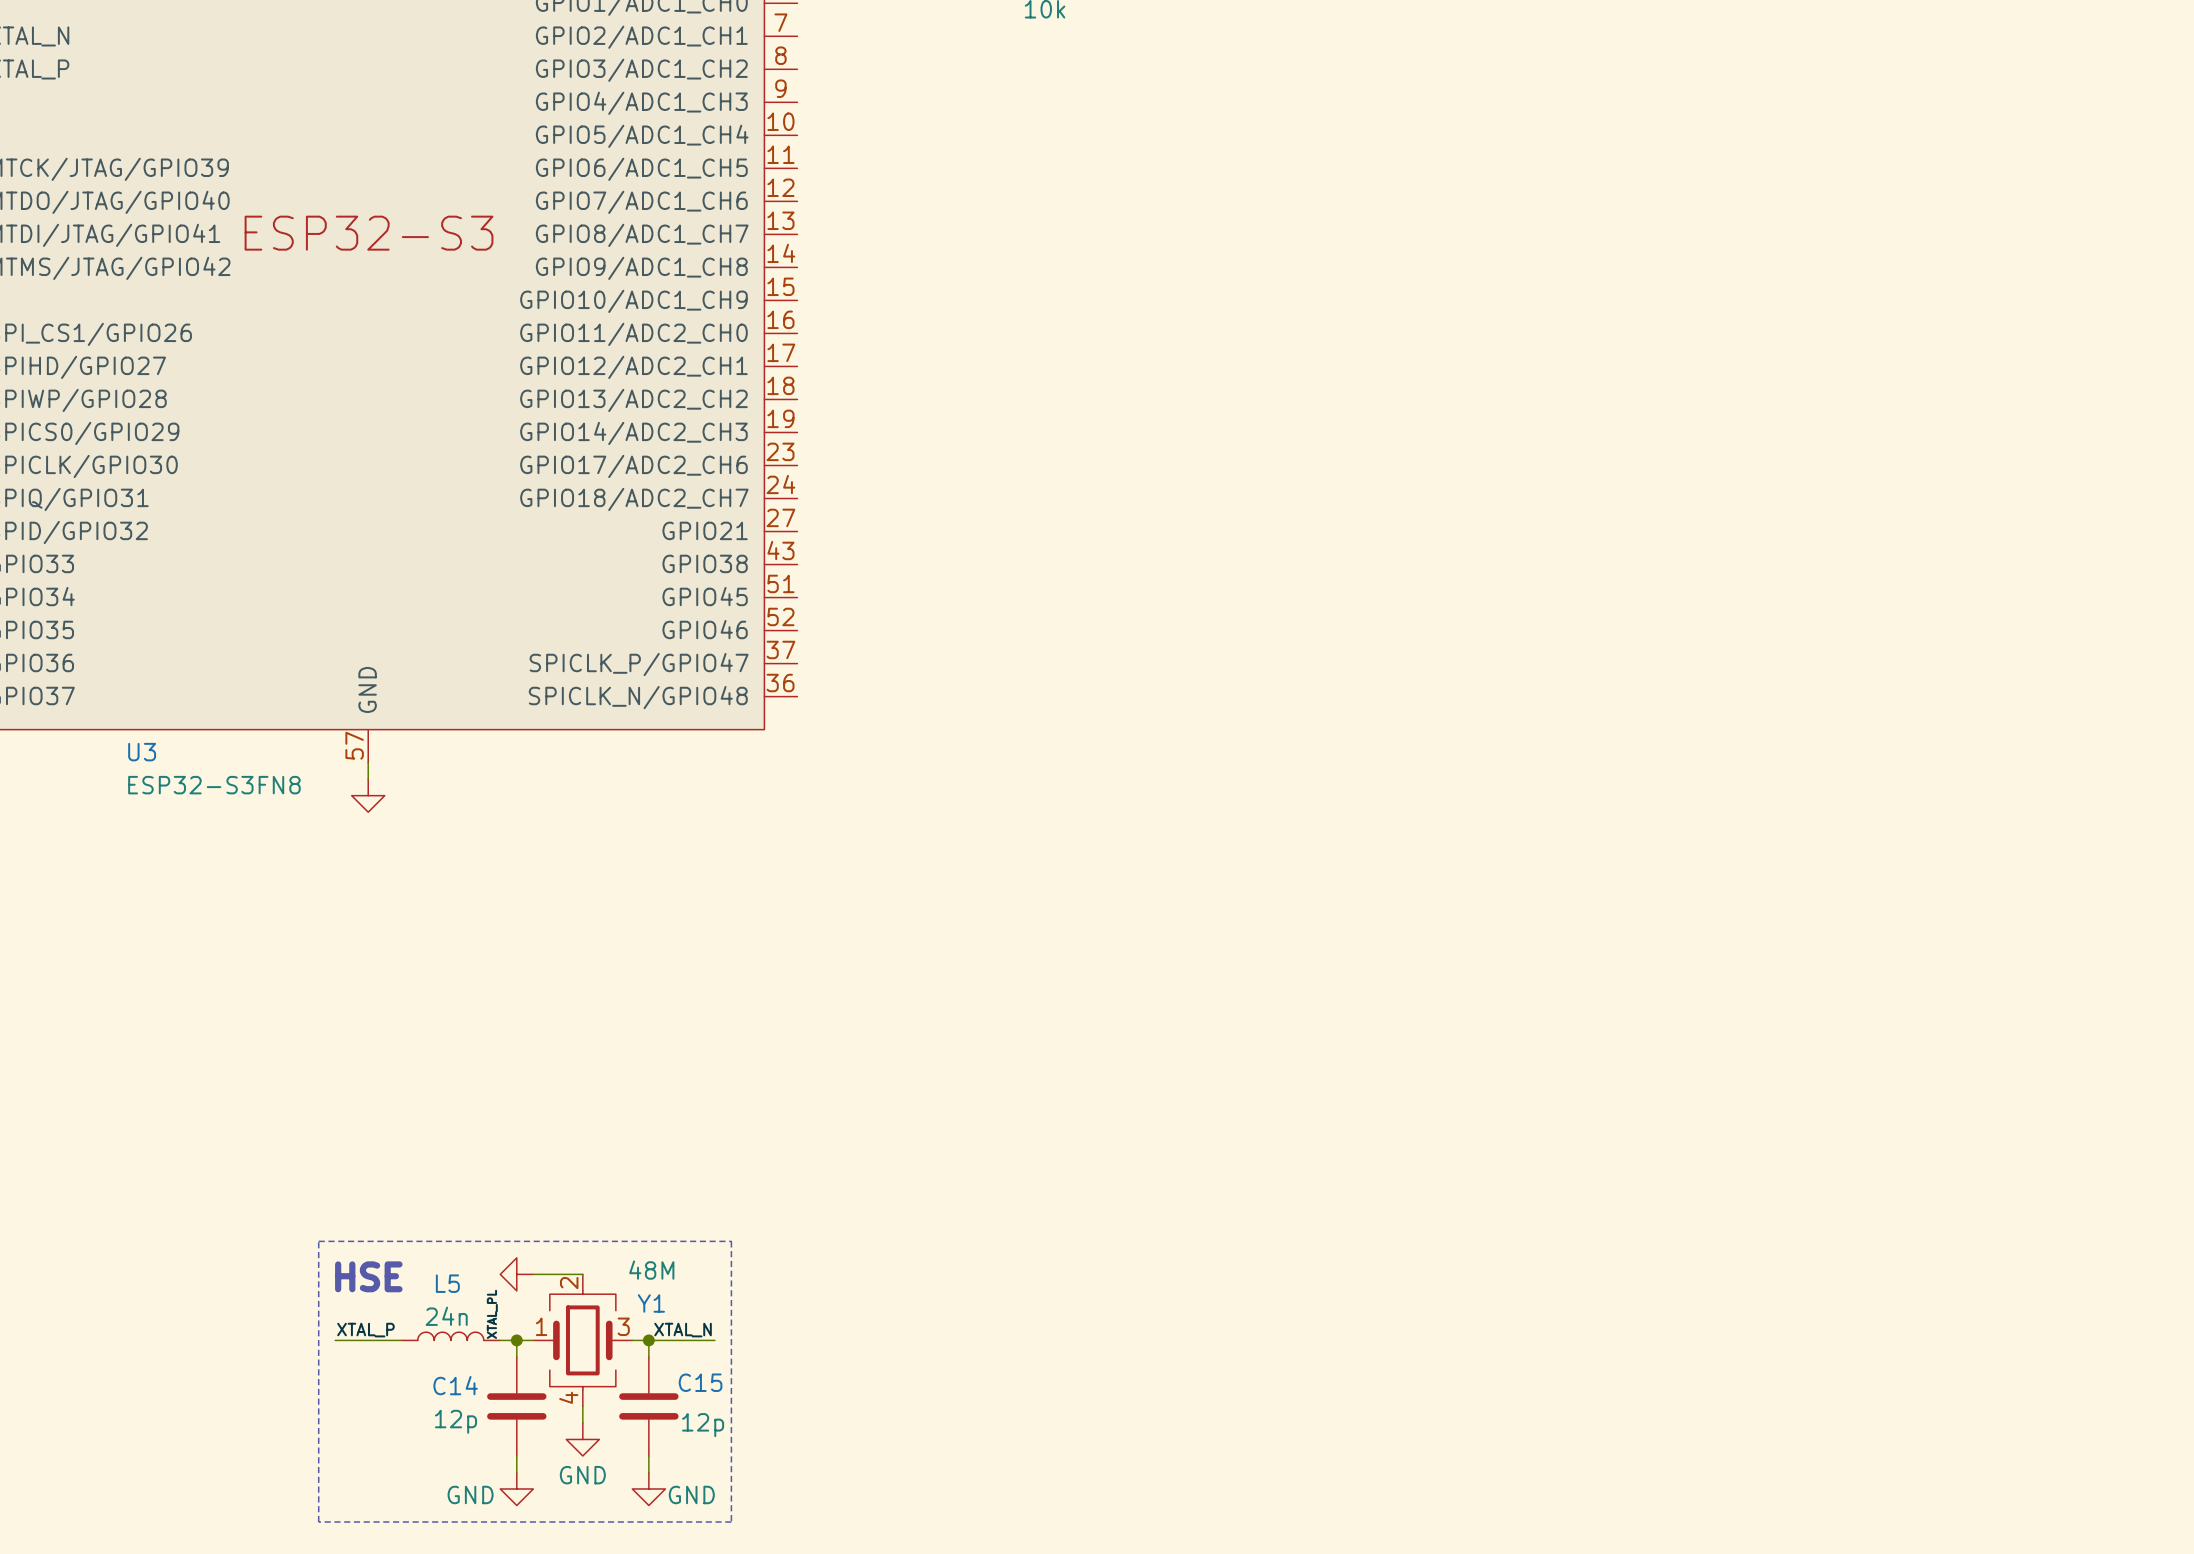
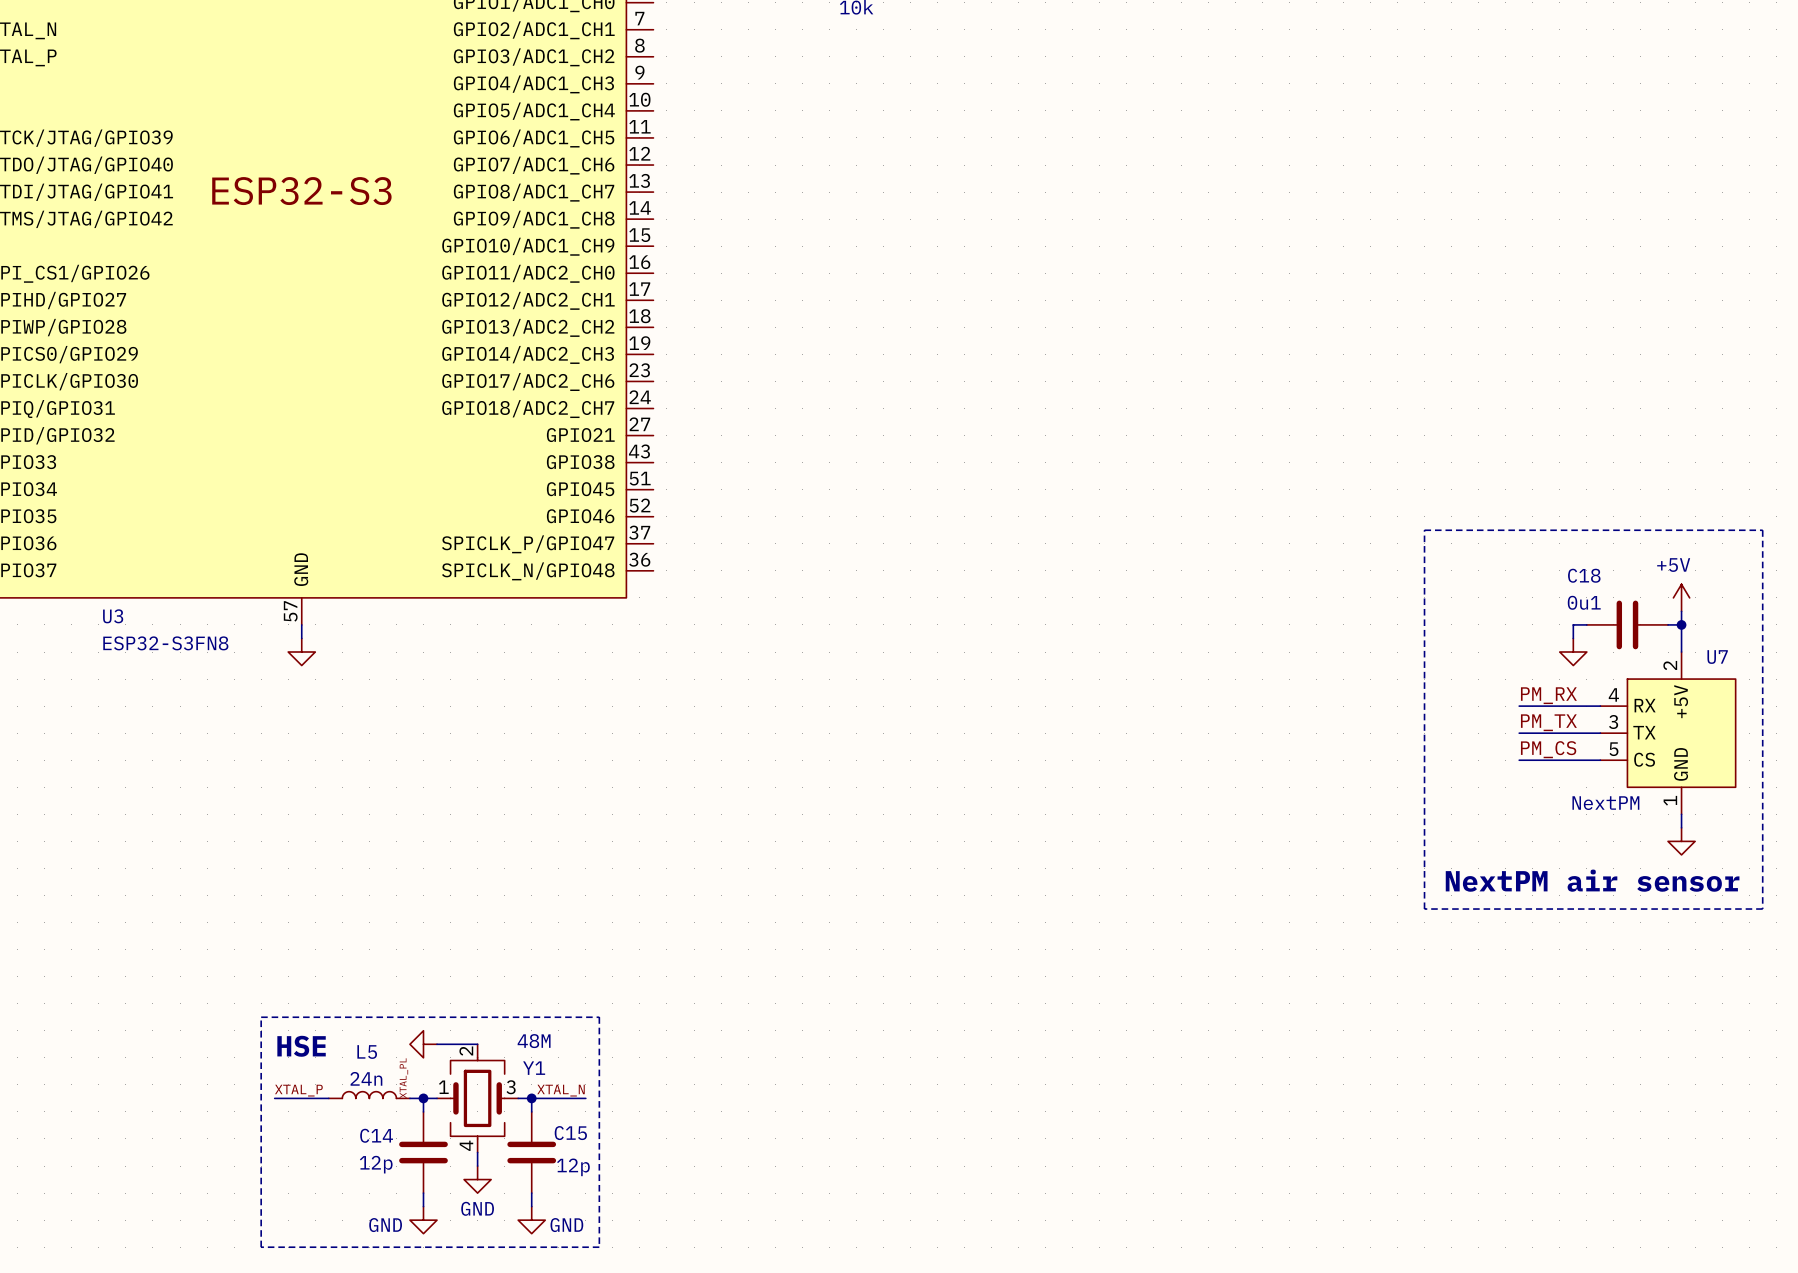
line: none -> (1424, 530) (1762, 530) (1762, 909) (1424, 909) (1424, 530)
power symbol: none -> +5V (1681, 597)
wire: none -> (1681, 611) (1681, 652)
wire: none -> (1586, 624) (1573, 624) (1573, 638)
C18: none -> 0u1 (1627, 624)
wire: none -> (1668, 624) (1681, 624)
junction: none -> (1681, 624)
power symbol: none -> (1573, 652)
label: none -> PM_RX (1548, 695)
wire: none -> (1519, 706) (1600, 706)
label: none -> PM_TX (1548, 722)
wire: none -> (1519, 733) (1600, 733)
U7: none -> NextPM (1668, 733)
label: none -> PM_CS (1548, 749)
wire: none -> (1519, 760) (1600, 760)
wire: none -> (1681, 814) (1681, 827)
power symbol: none -> (1681, 841)
text: none -> NextPM air sensor (1592, 880)

